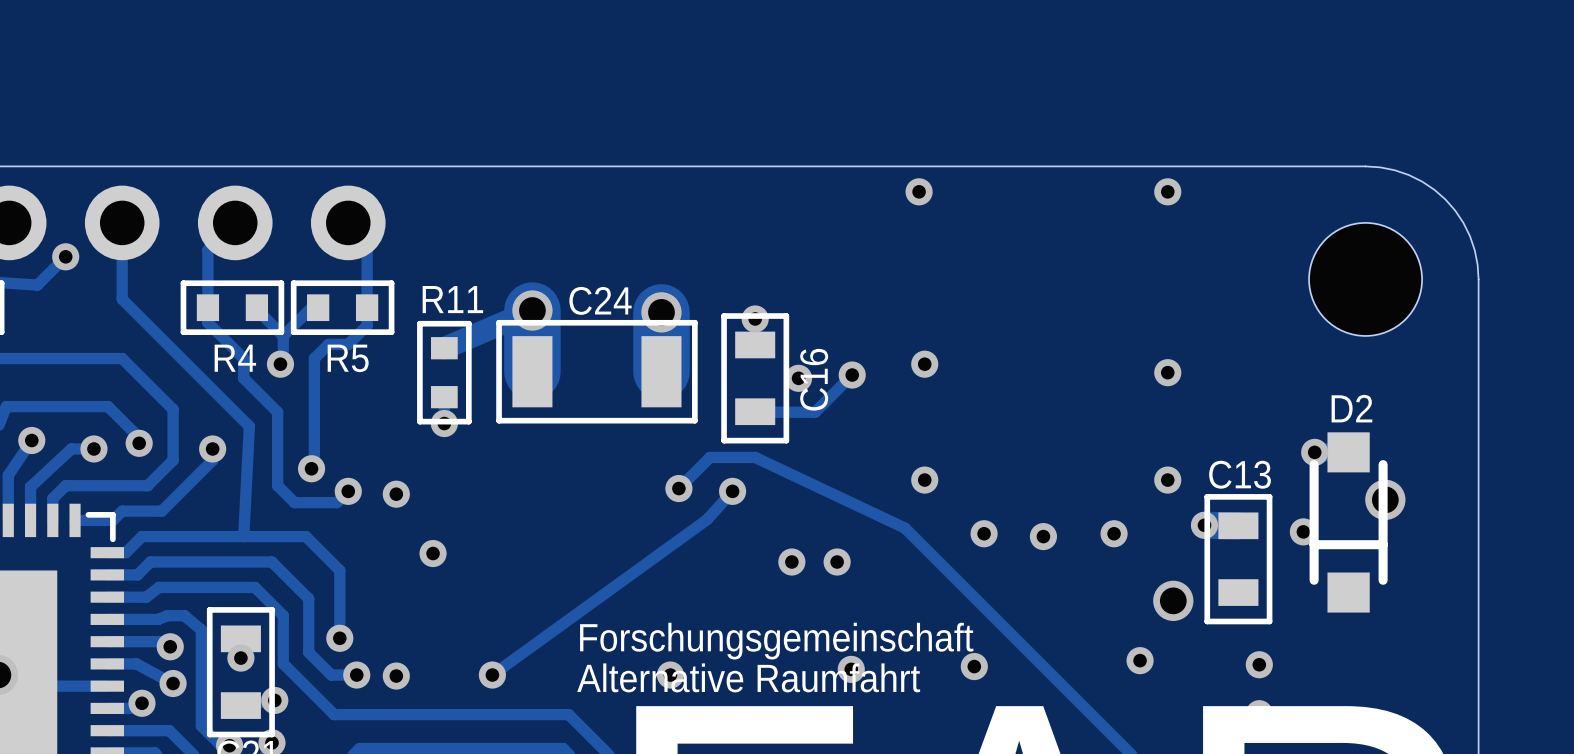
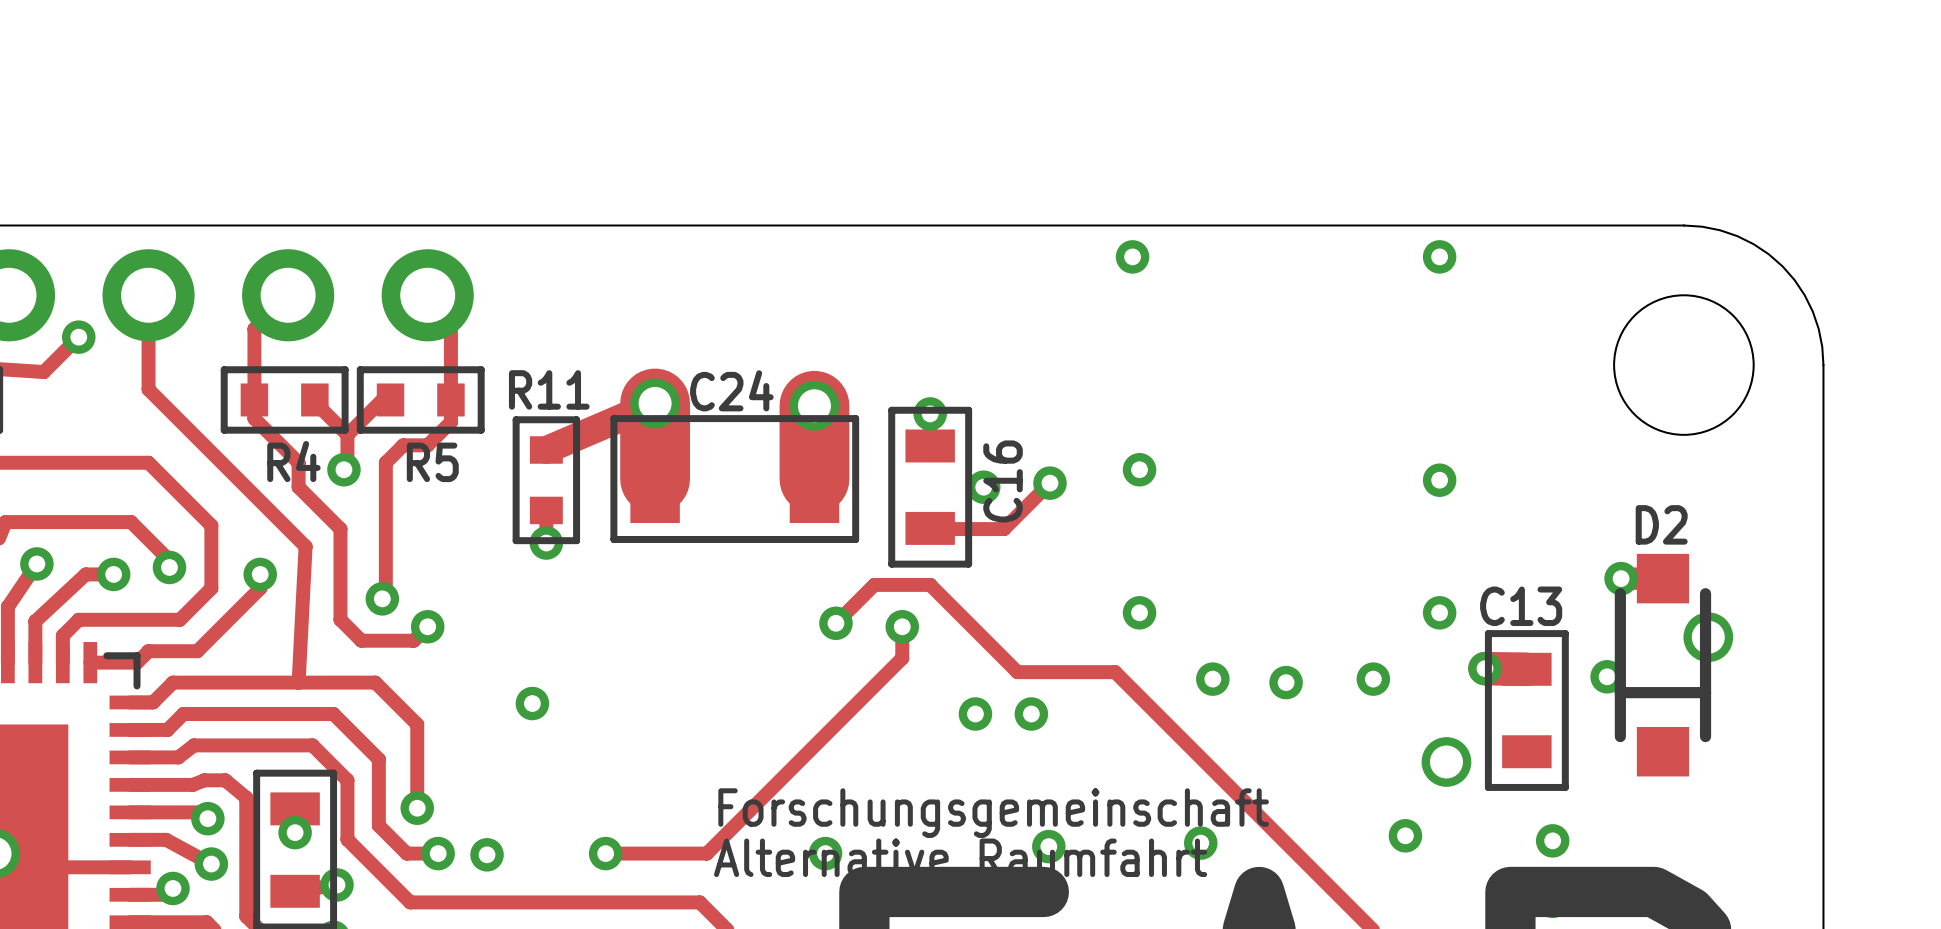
track: (755, 457) (904, 528) -> (930, 584) (1017, 672) (1115, 672)
track: (732, 491) (707, 519) (492, 675) -> (902, 626) (902, 658) (706, 853) (605, 853)
via: (396, 494) -> none

